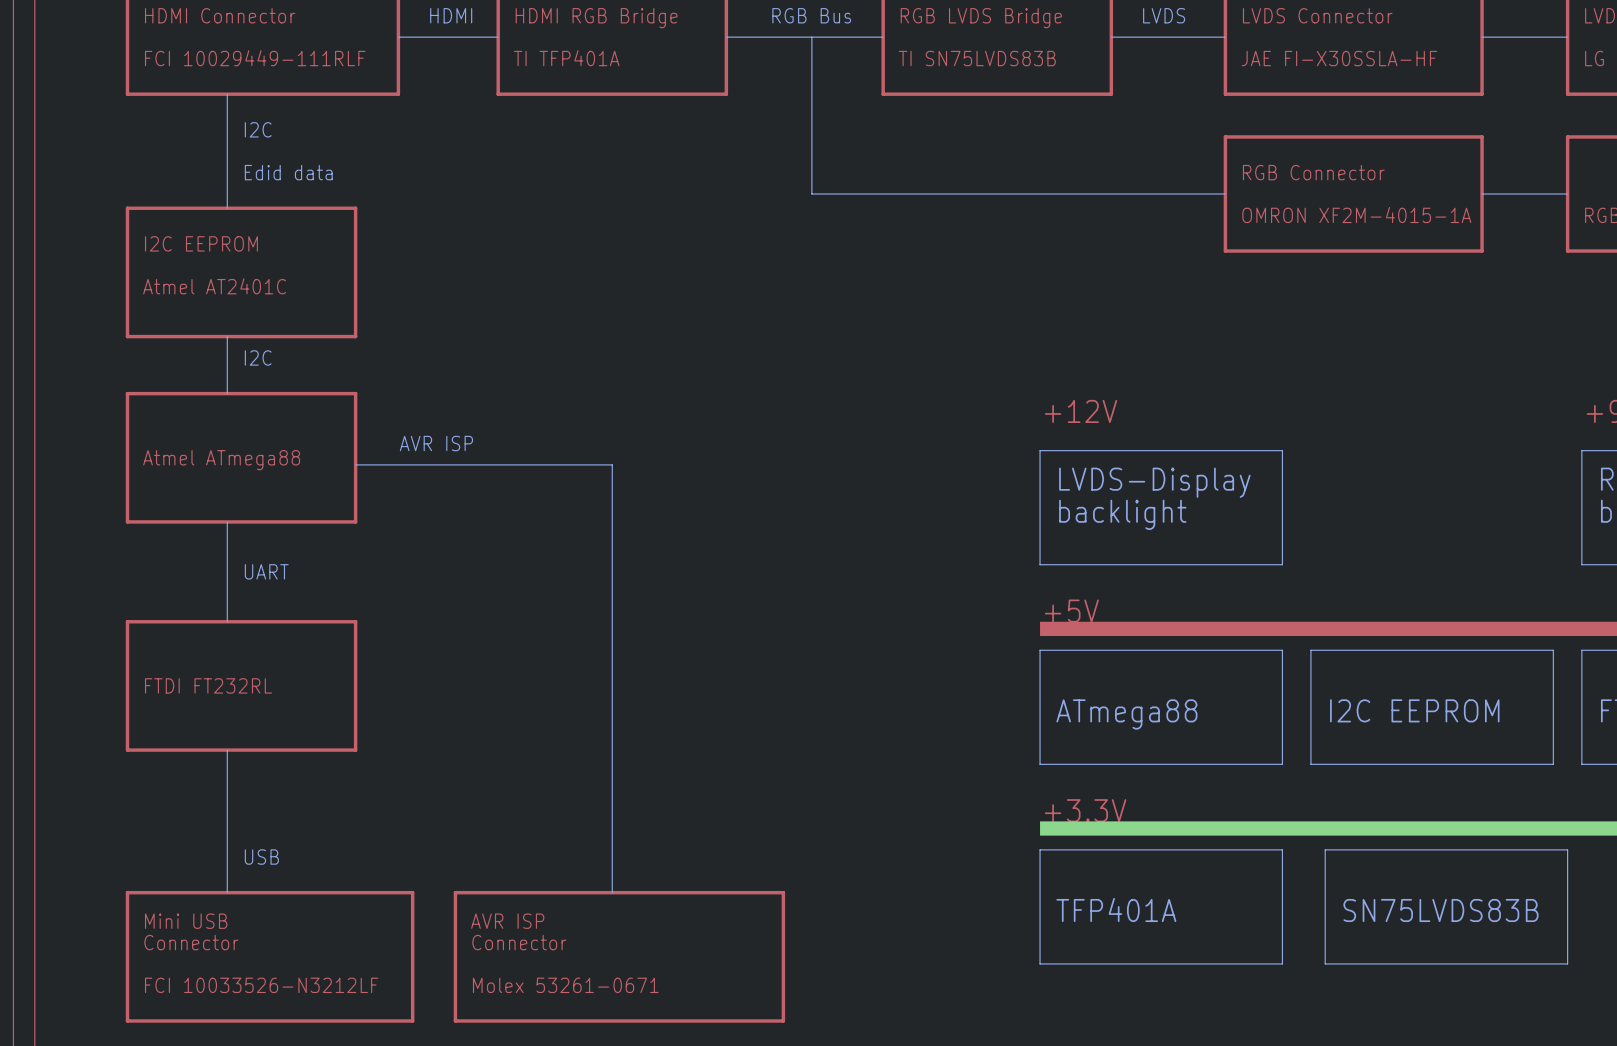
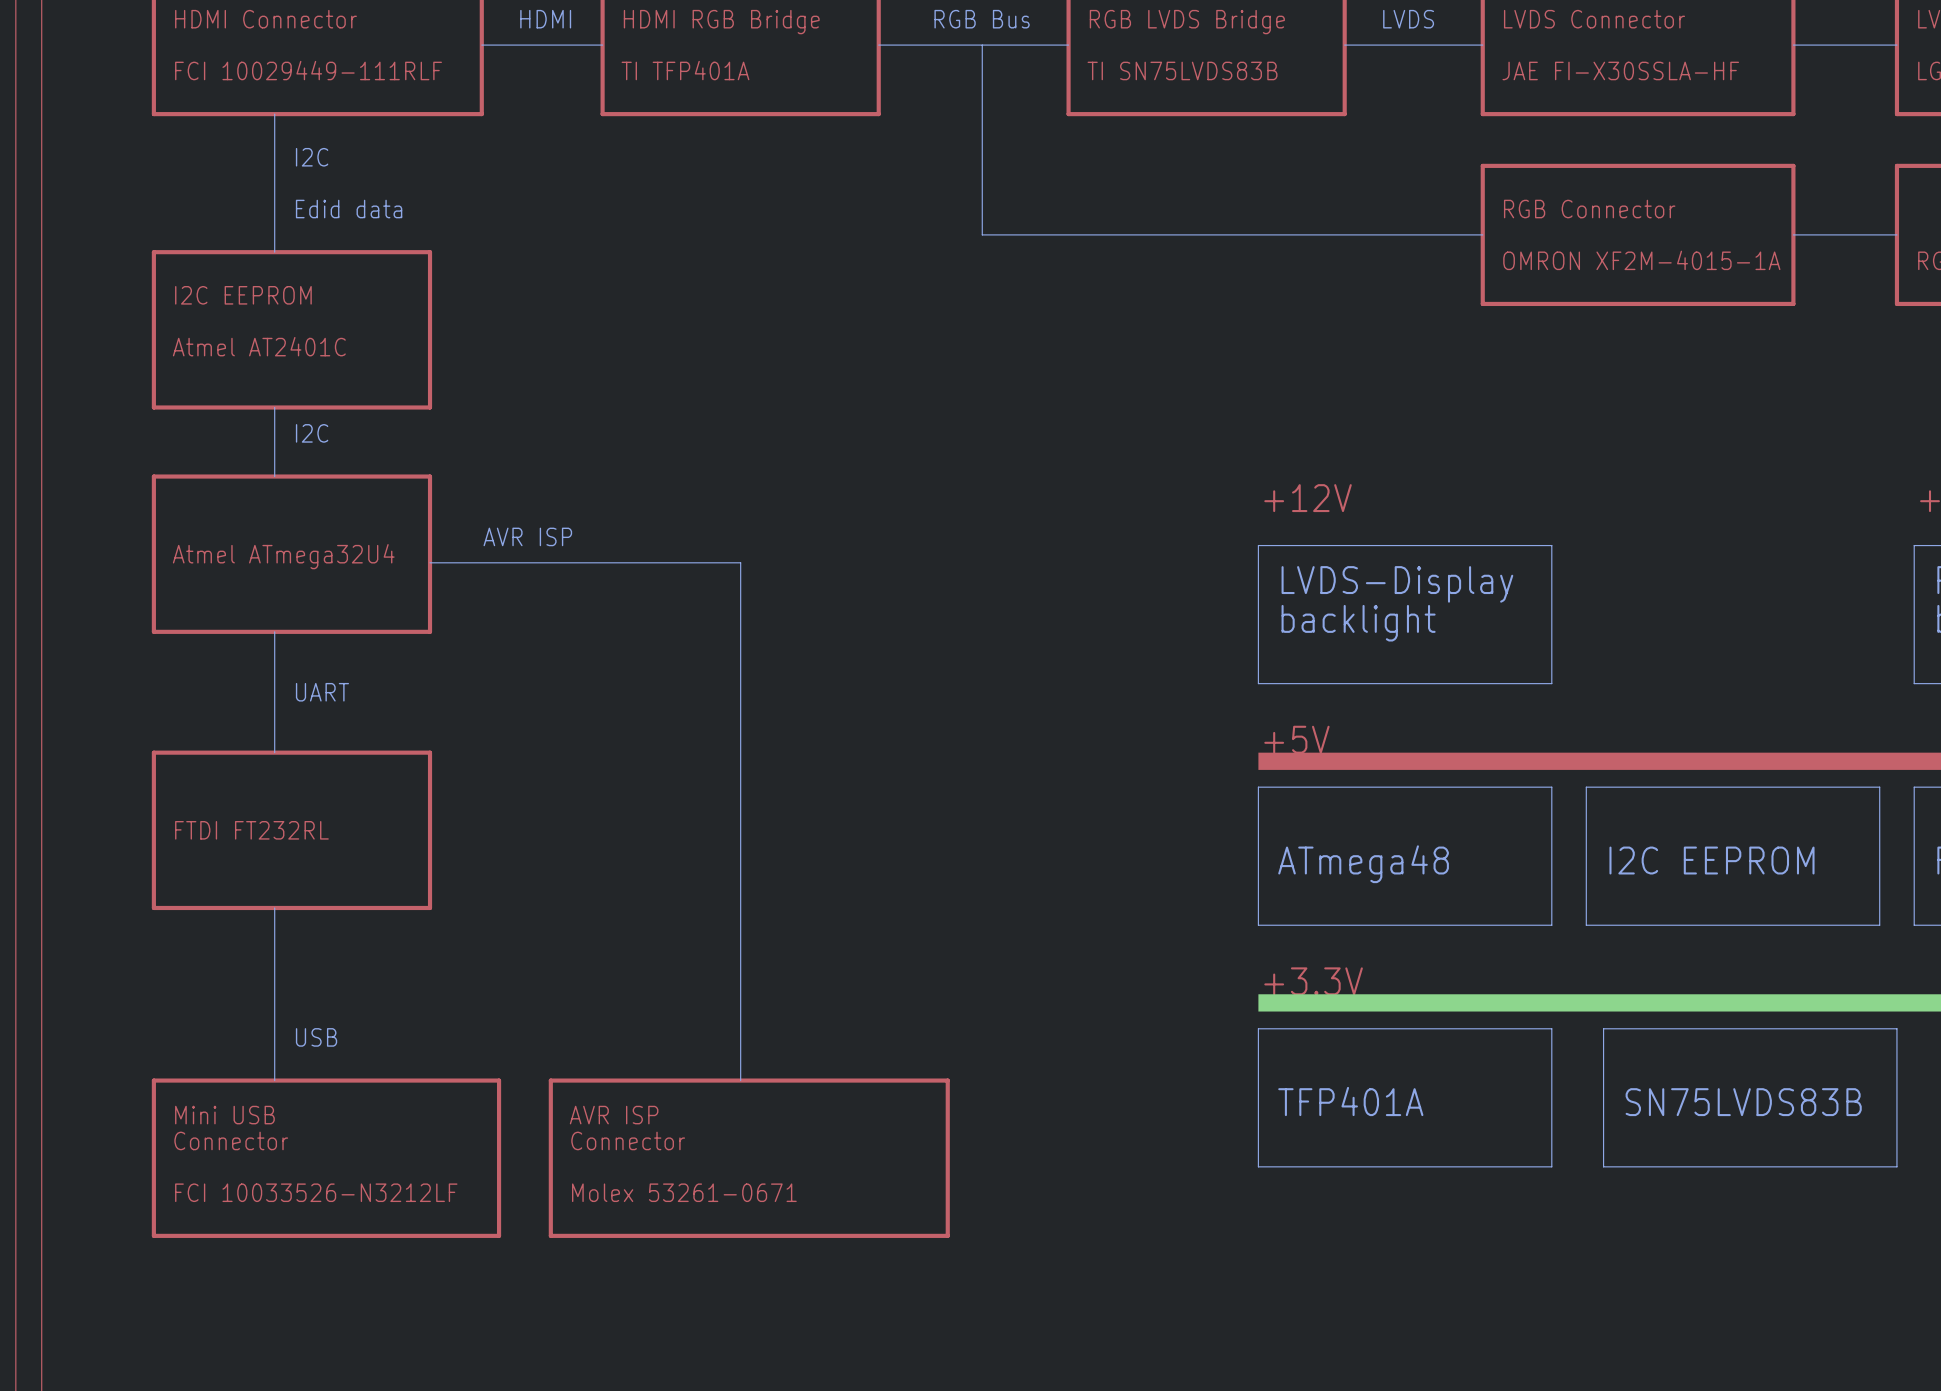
text: Atmel ATmega88 (221, 460) -> Atmel ATmega32U4 (283, 556)
text: ATmega88 (1126, 714) -> ATmega48 (1363, 864)

